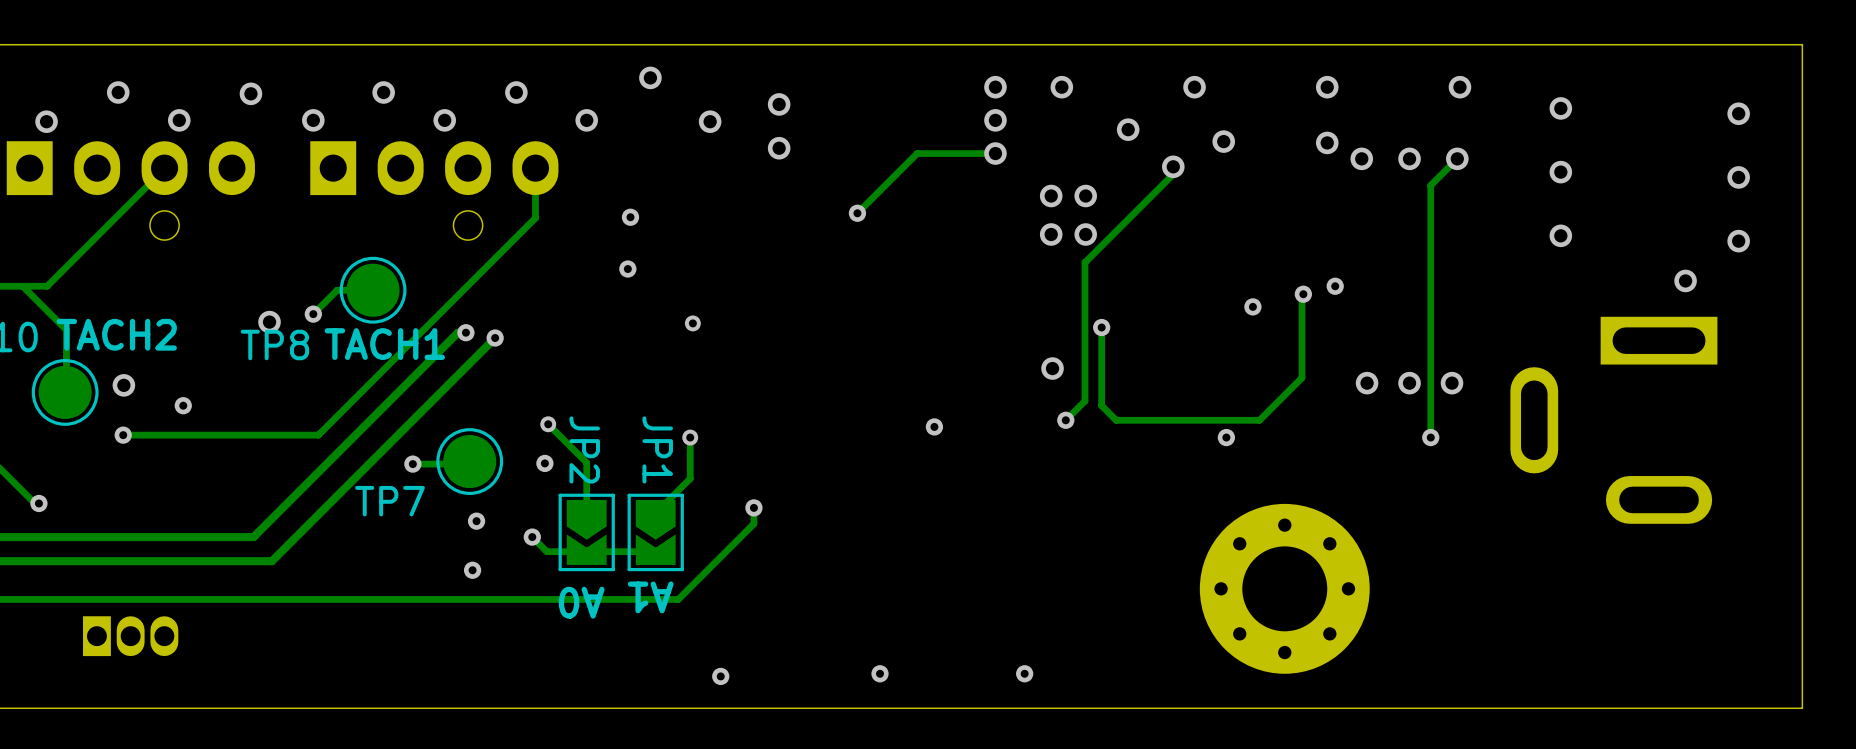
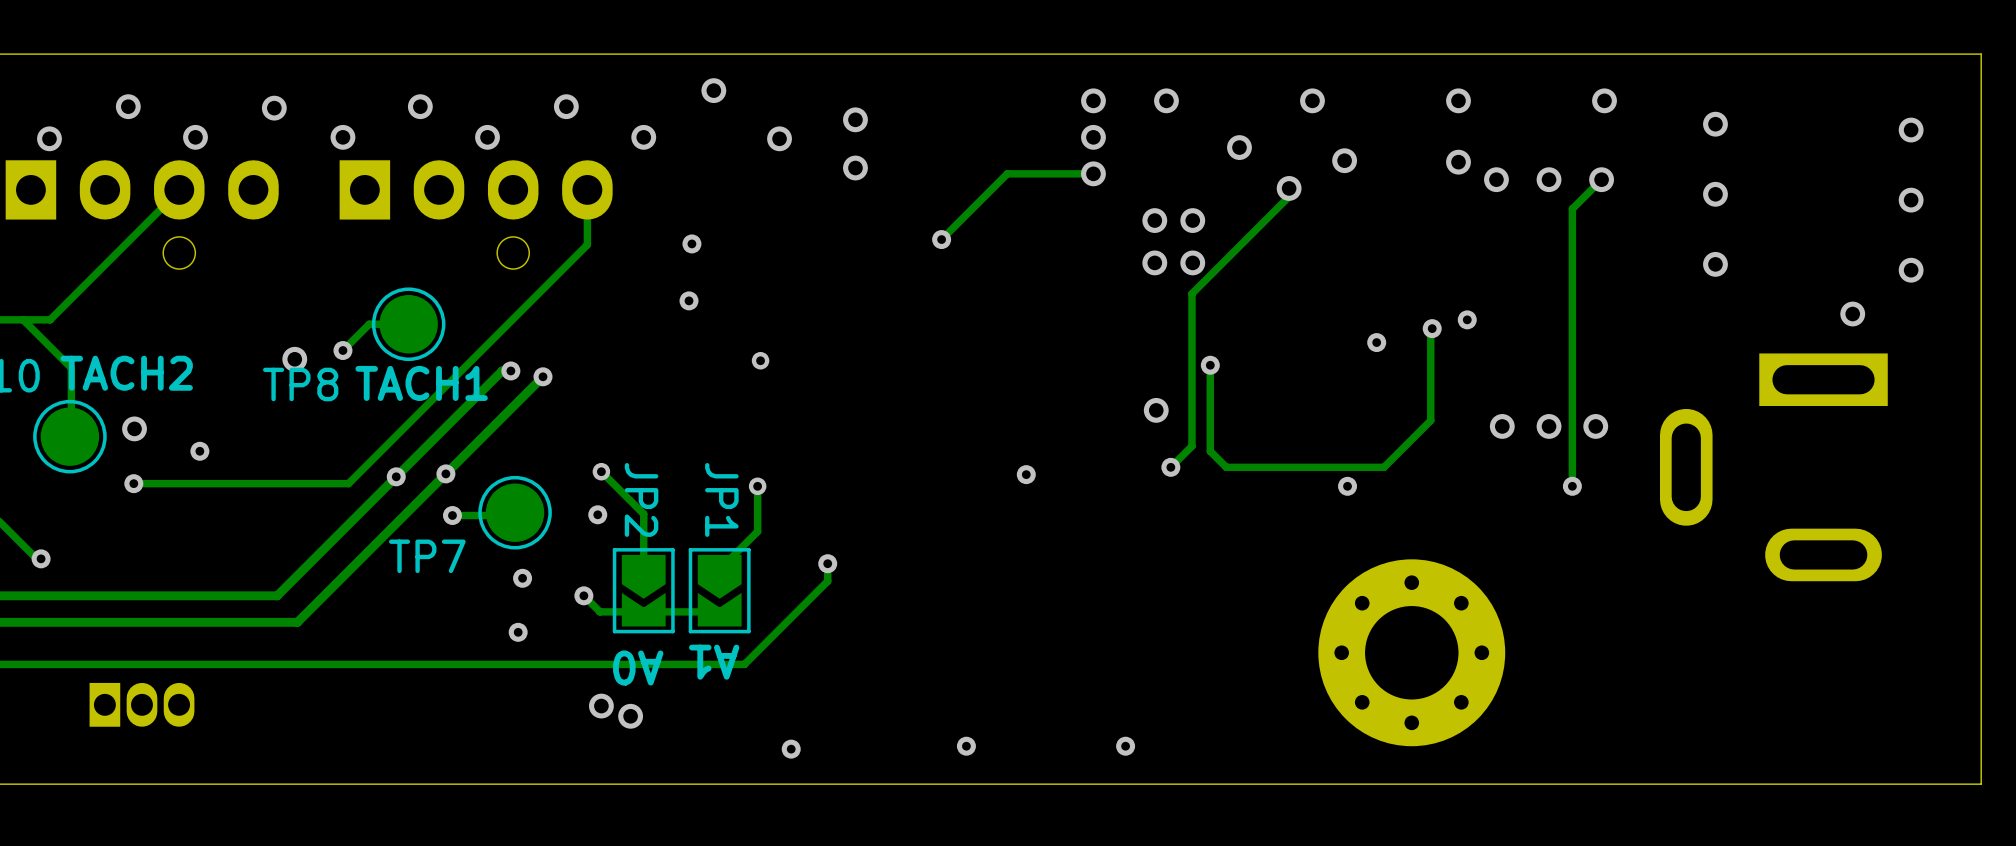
via: none -> (445, 473)
via: none -> (396, 476)
via: none -> (601, 706)
via: none -> (630, 716)

